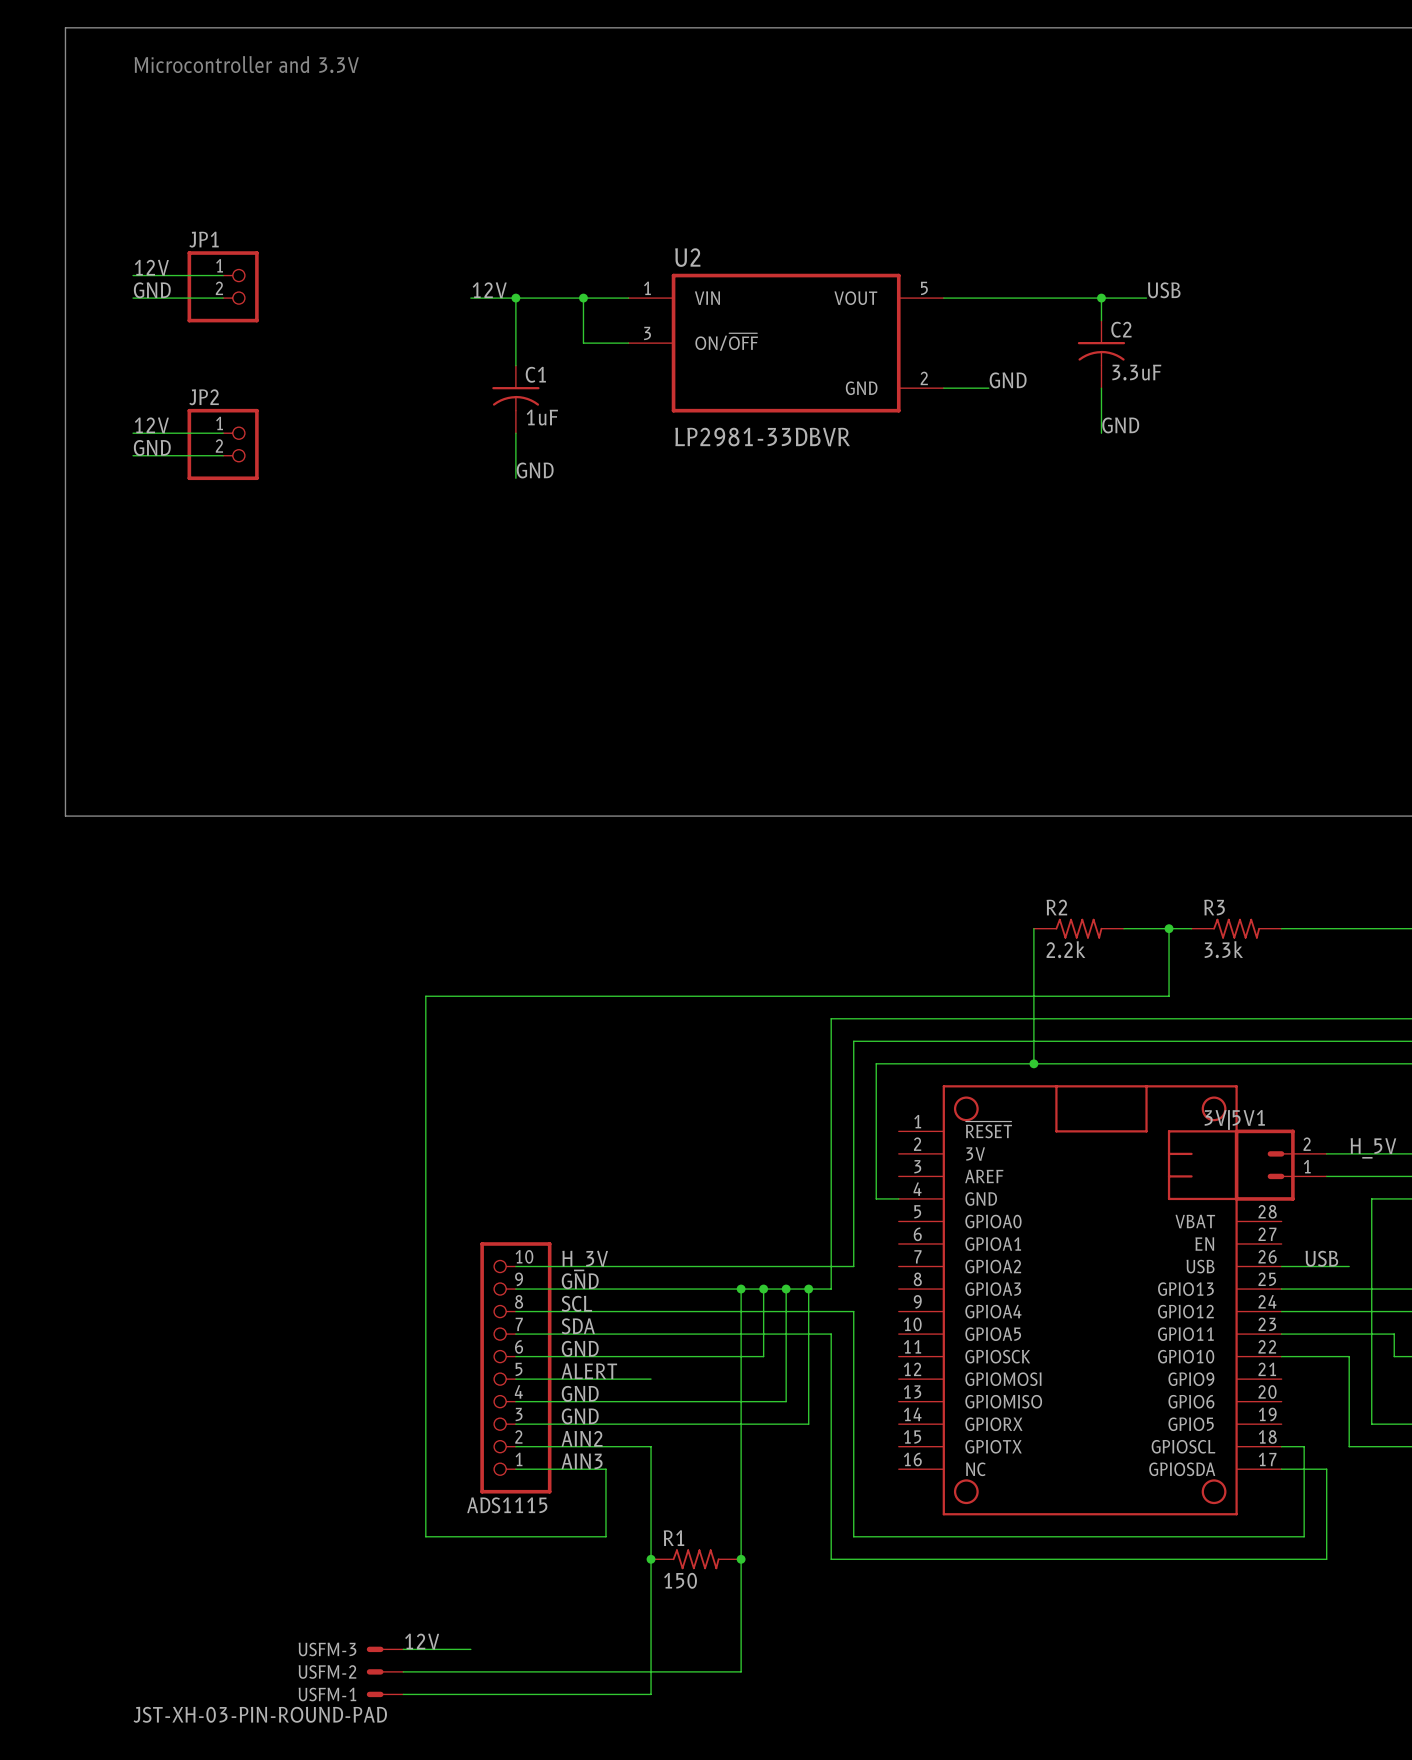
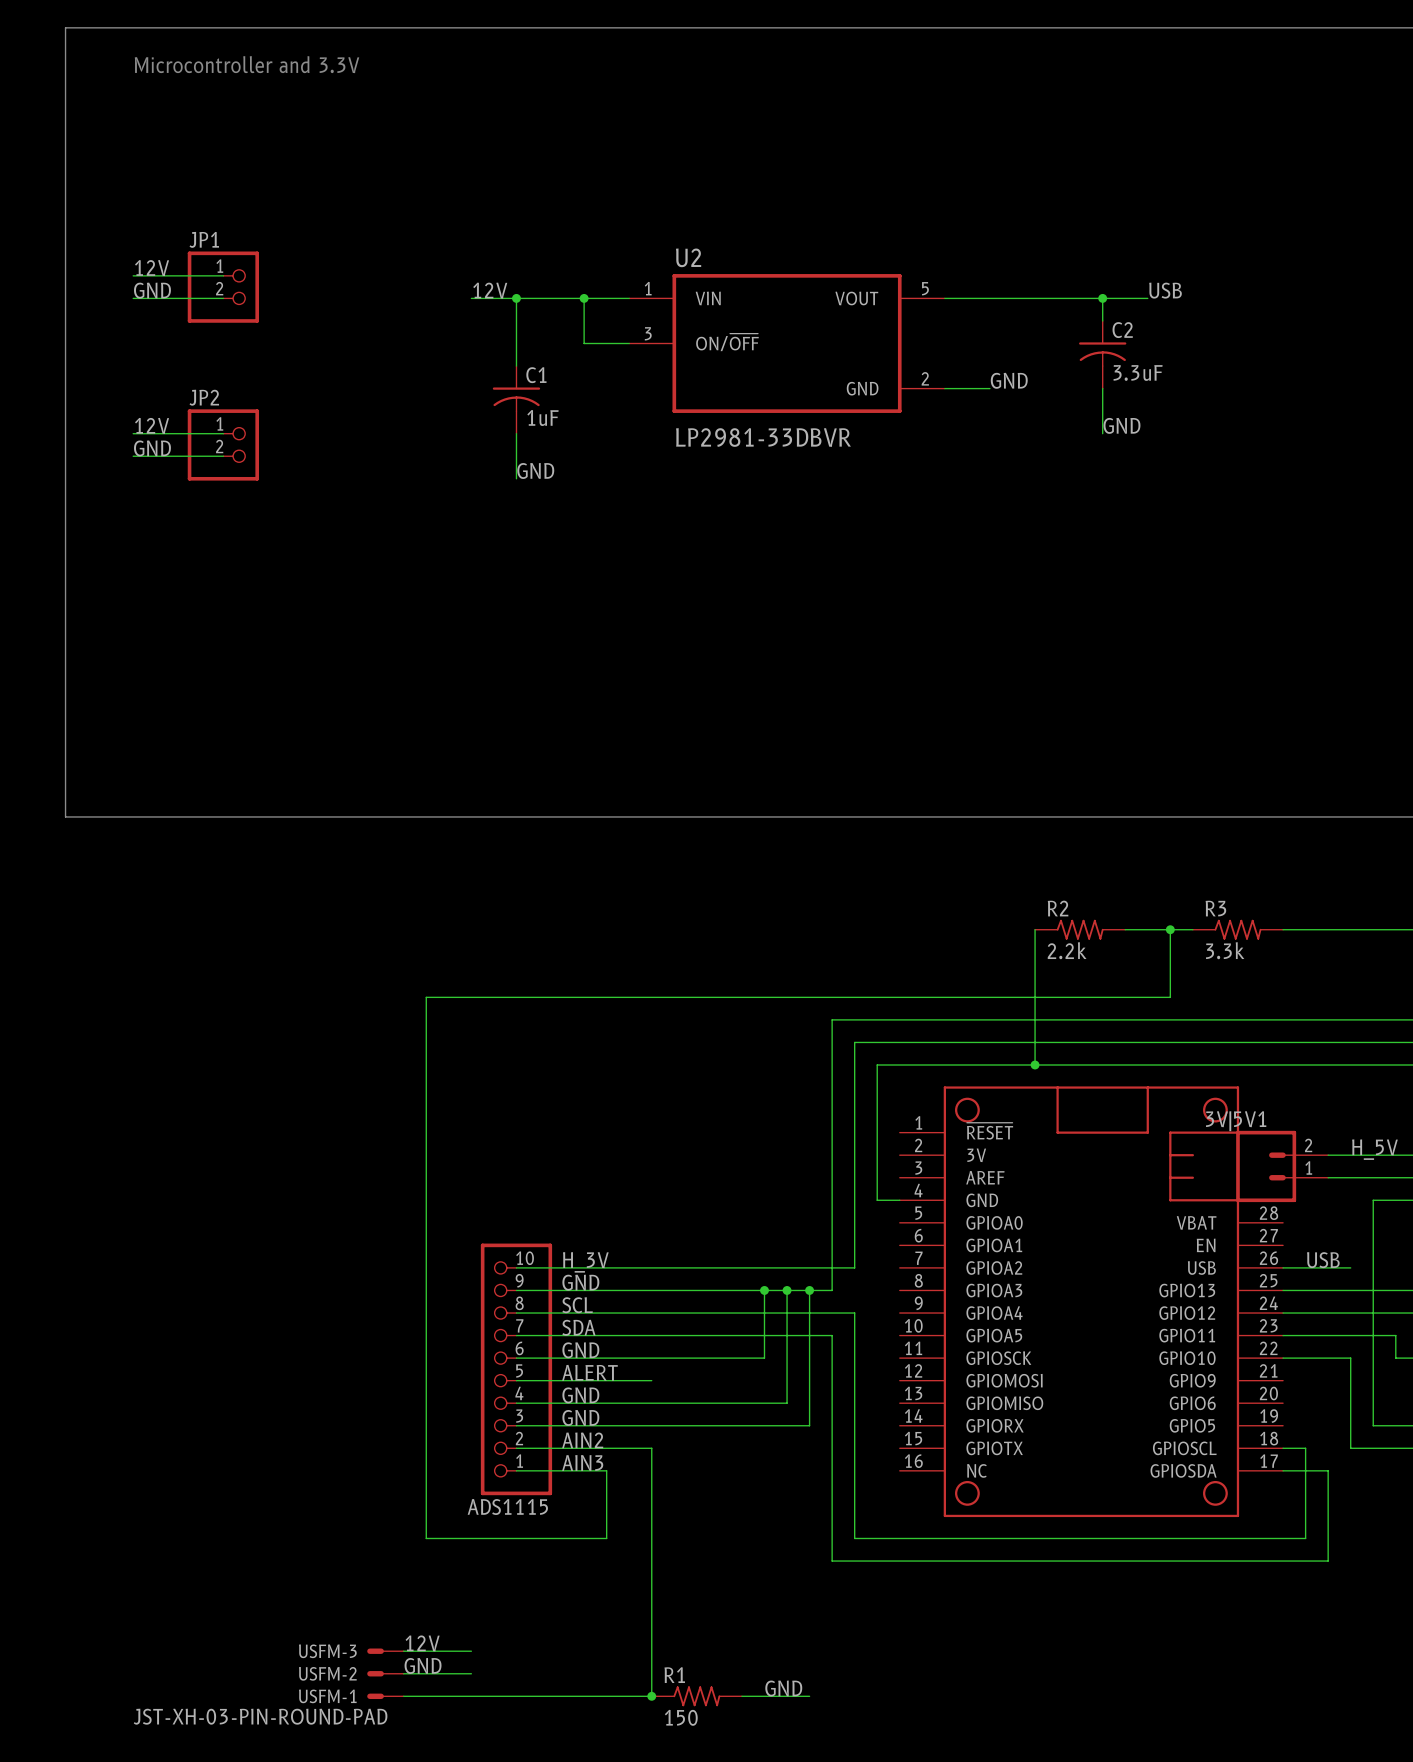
wire: (741, 1289) (741, 1671) (470, 1671) -> none
junction: (741, 1289) -> none
junction: (651, 1559) -> none
R1 position: (696, 1559) -> (696, 1696)
junction: (741, 1559) -> none
label: none -> GND (423, 1665)
label: none -> GND (783, 1688)
junction: none -> (651, 1696)
wire: none -> (741, 1696) (809, 1696)

